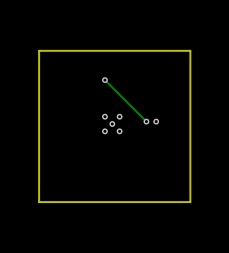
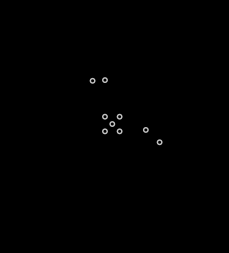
board edge: (190, 50) (39, 50) (39, 202) (190, 202) (190, 50) -> none
via: none -> (92, 80)
track: (104, 80) (146, 121) -> none
via: (146, 121) -> none
via: (156, 121) -> none
via: none -> (145, 129)
via: none -> (159, 142)

